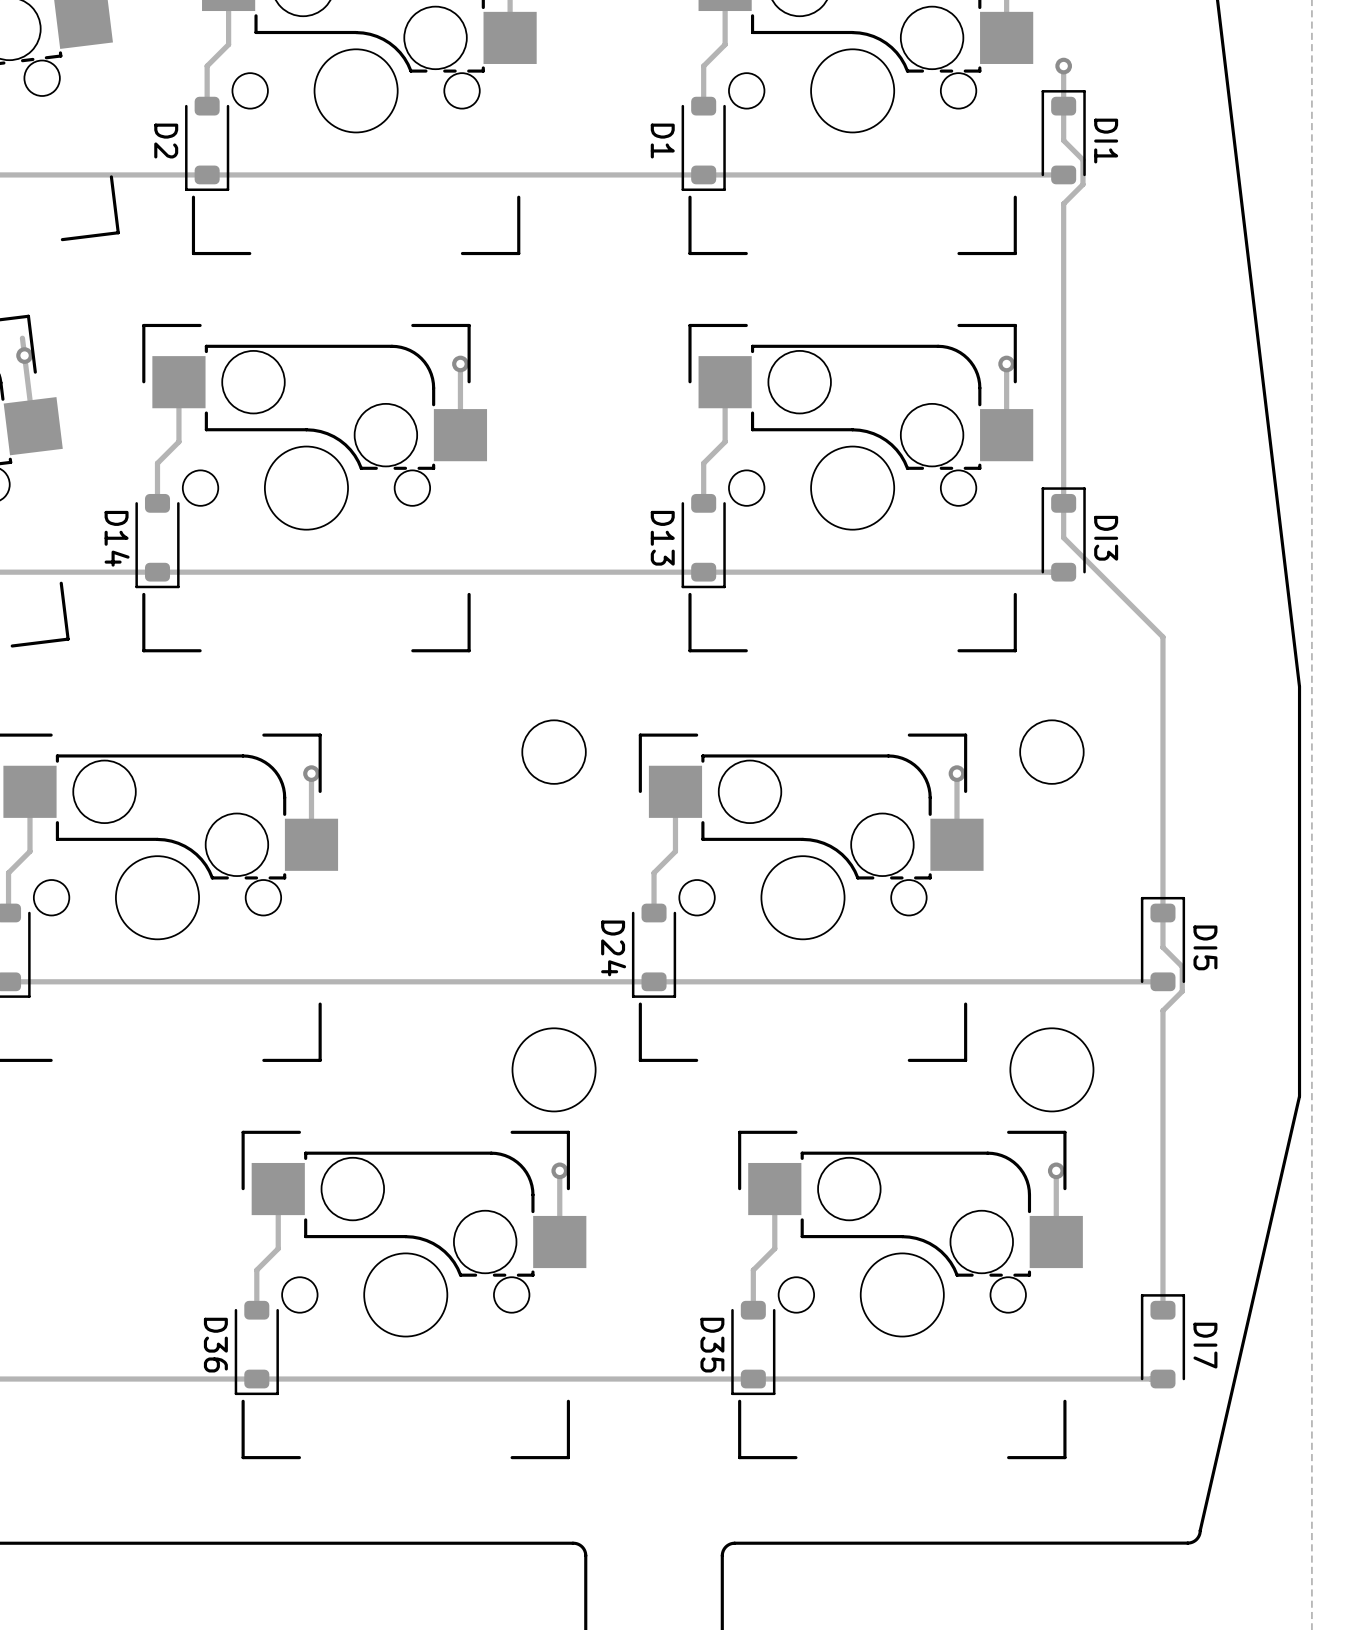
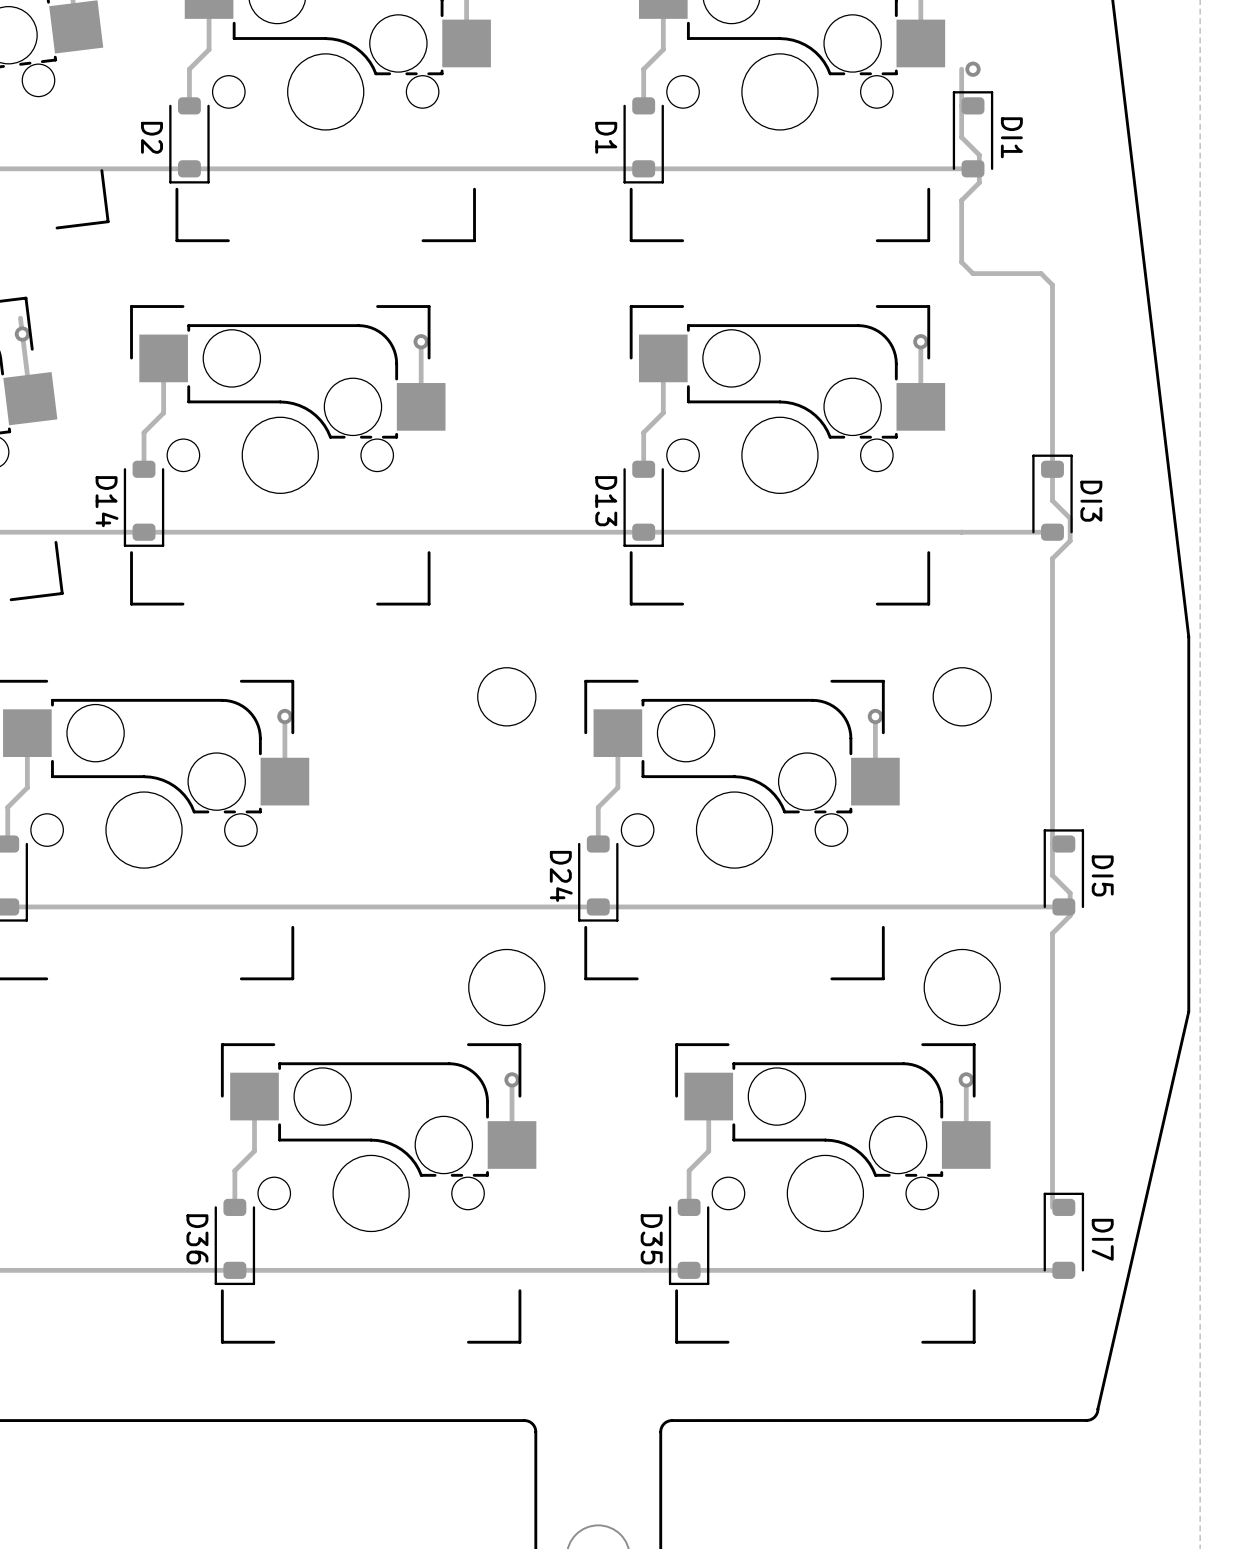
track: none -> (961, 69) (961, 137) (979, 155) (979, 182) (961, 200) (961, 262) (973, 273) (1041, 273) (1052, 284) (1052, 500) (1070, 518) (1070, 540) (1052, 558) (1052, 875) (1070, 893) (1070, 915) (1052, 933) (1052, 1207)
track: (1063, 66) (1063, 140) (1082, 159) (1082, 184) (1063, 203) (1063, 537) (1162, 637) (1162, 947) (1182, 966) (1182, 991) (1162, 1010) (1162, 1310) -> none
DI3 position: (1063, 534) -> (1052, 497)
track: none -> (1052, 532) (961, 532)

